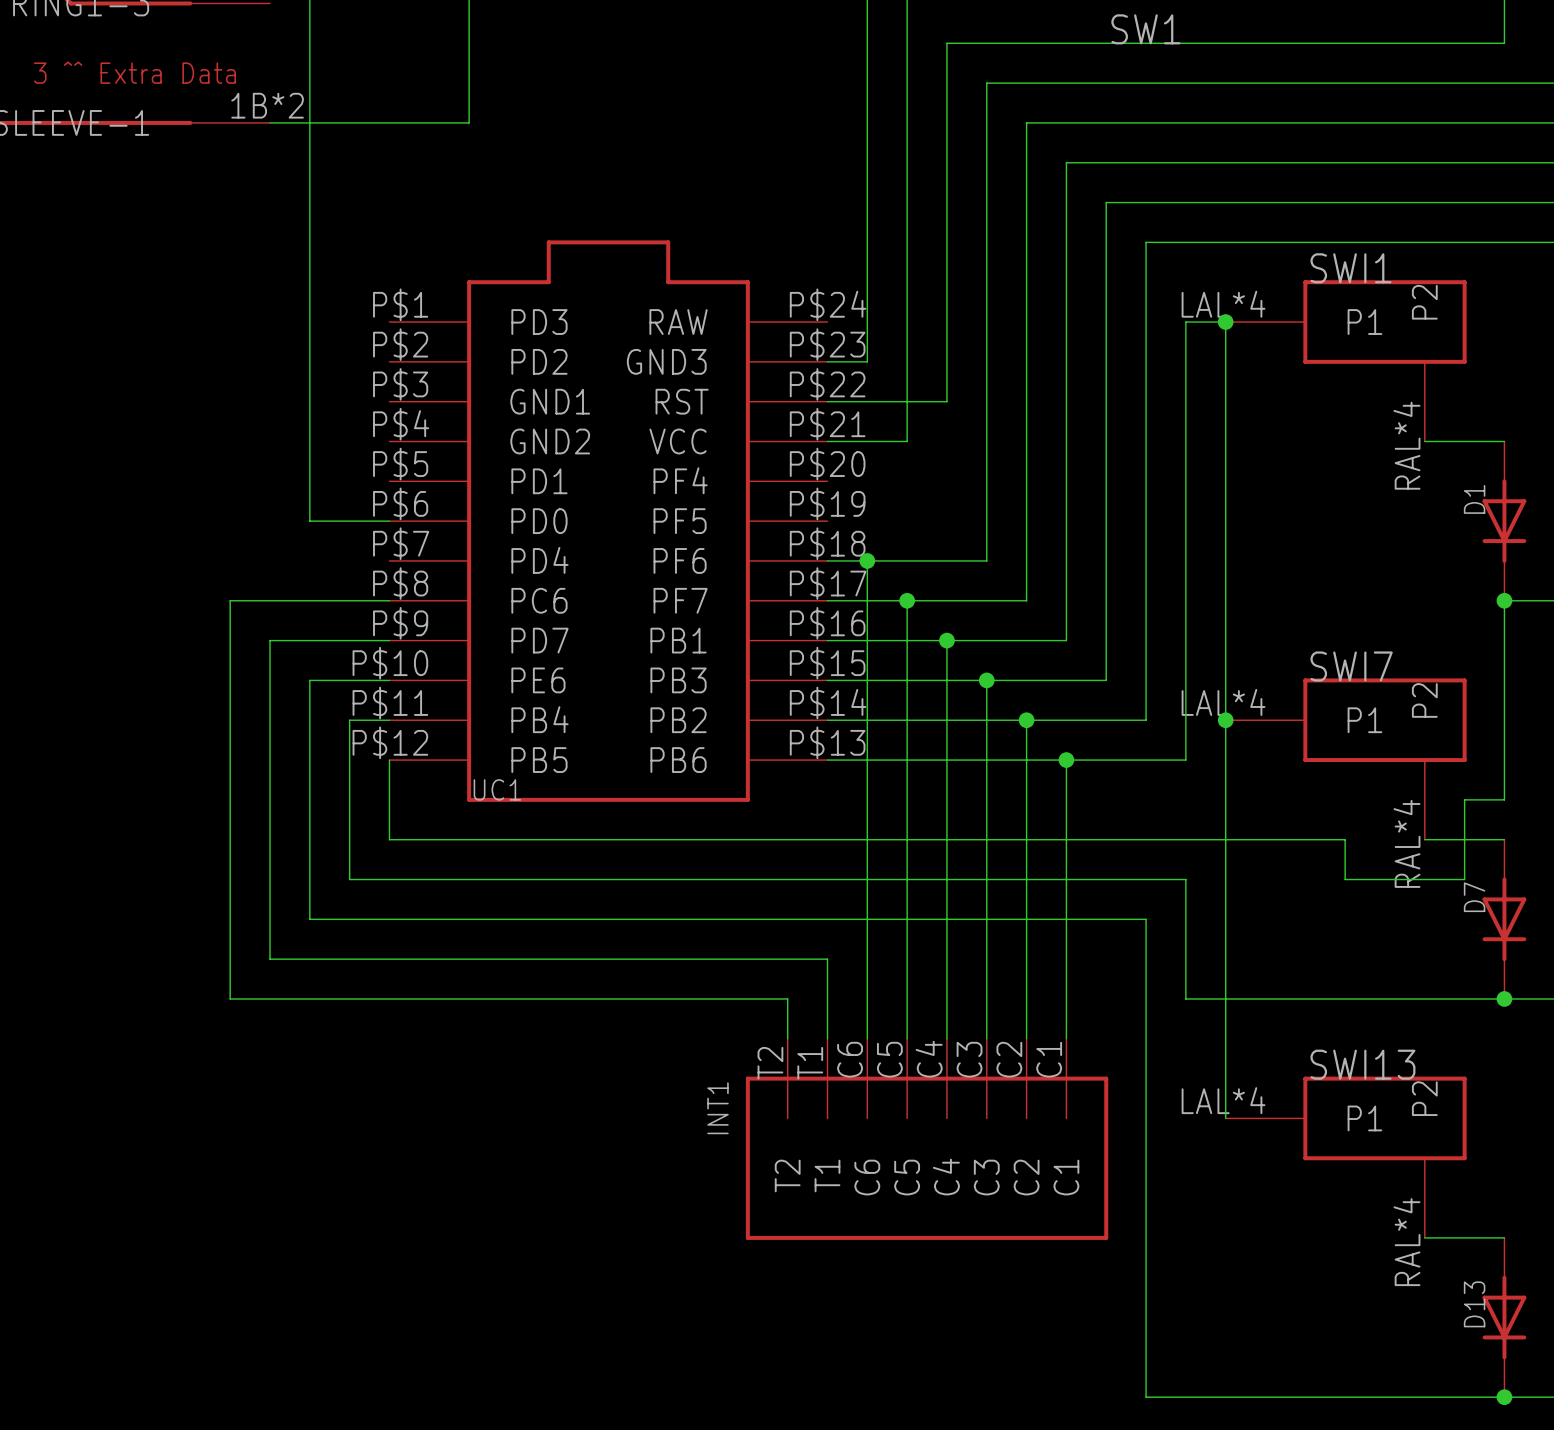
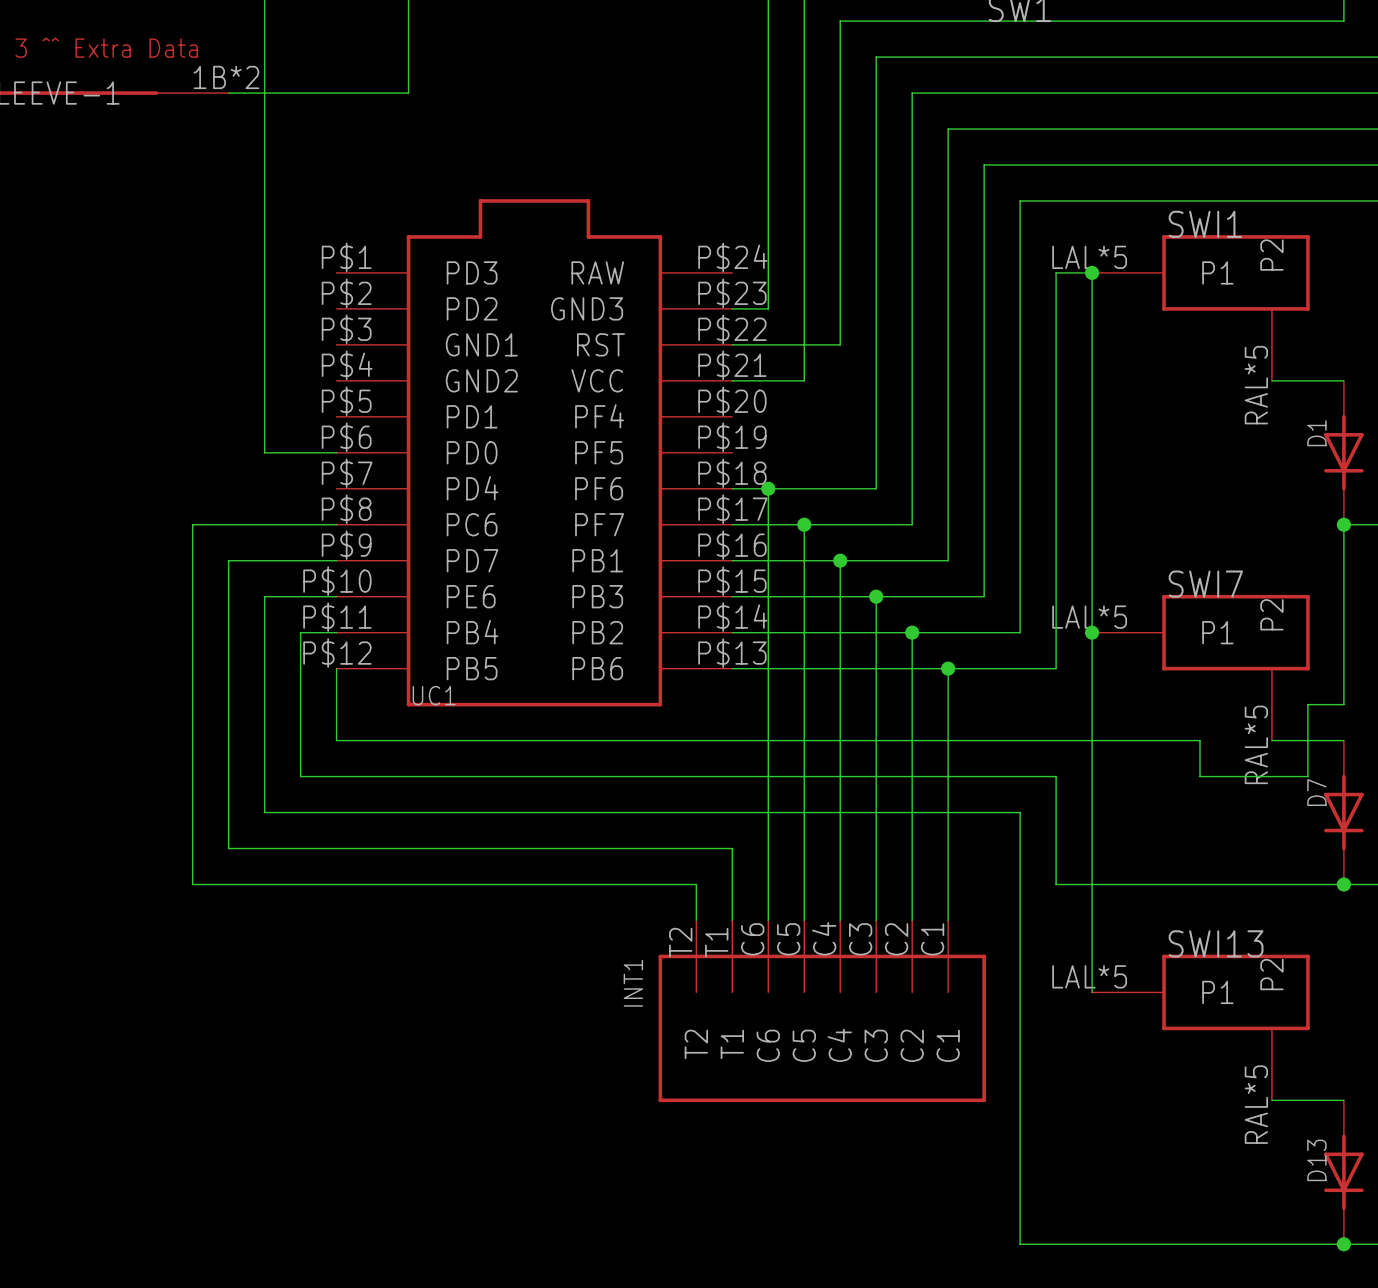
SWI1 pin number: LAL*4 (1223, 304) -> LAL*5 (1089, 257)
SWI1 pin number: RAL*4 (1406, 445) -> RAL*5 (1256, 385)
SWI7 pin number: LAL*4 (1223, 702) -> LAL*5 (1089, 617)
SWI7 pin number: RAL*4 (1406, 843) -> RAL*5 (1256, 744)
SWI13 pin number: LAL*4 (1223, 1100) -> LAL*5 (1089, 976)
SWI13 pin number: RAL*4 (1406, 1242) -> RAL*5 (1256, 1104)

